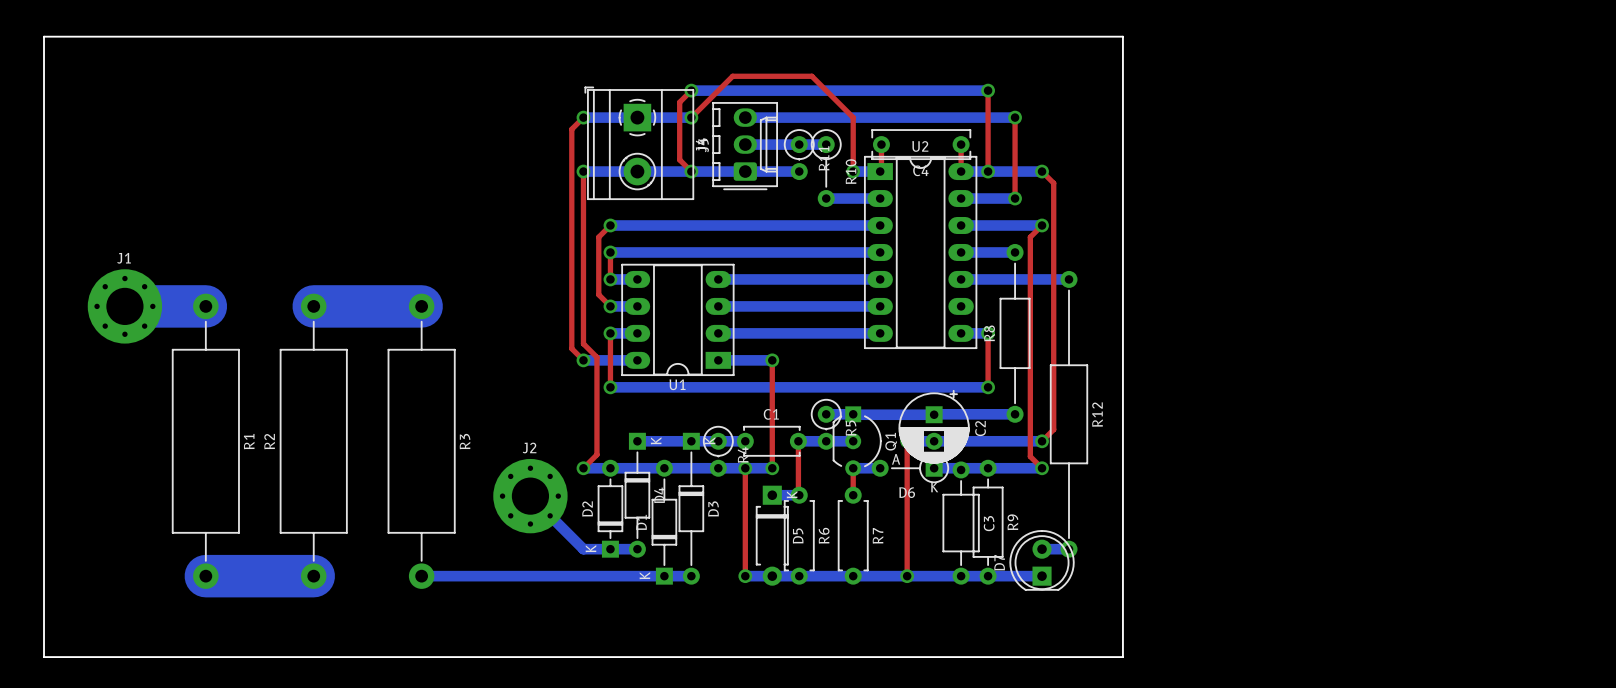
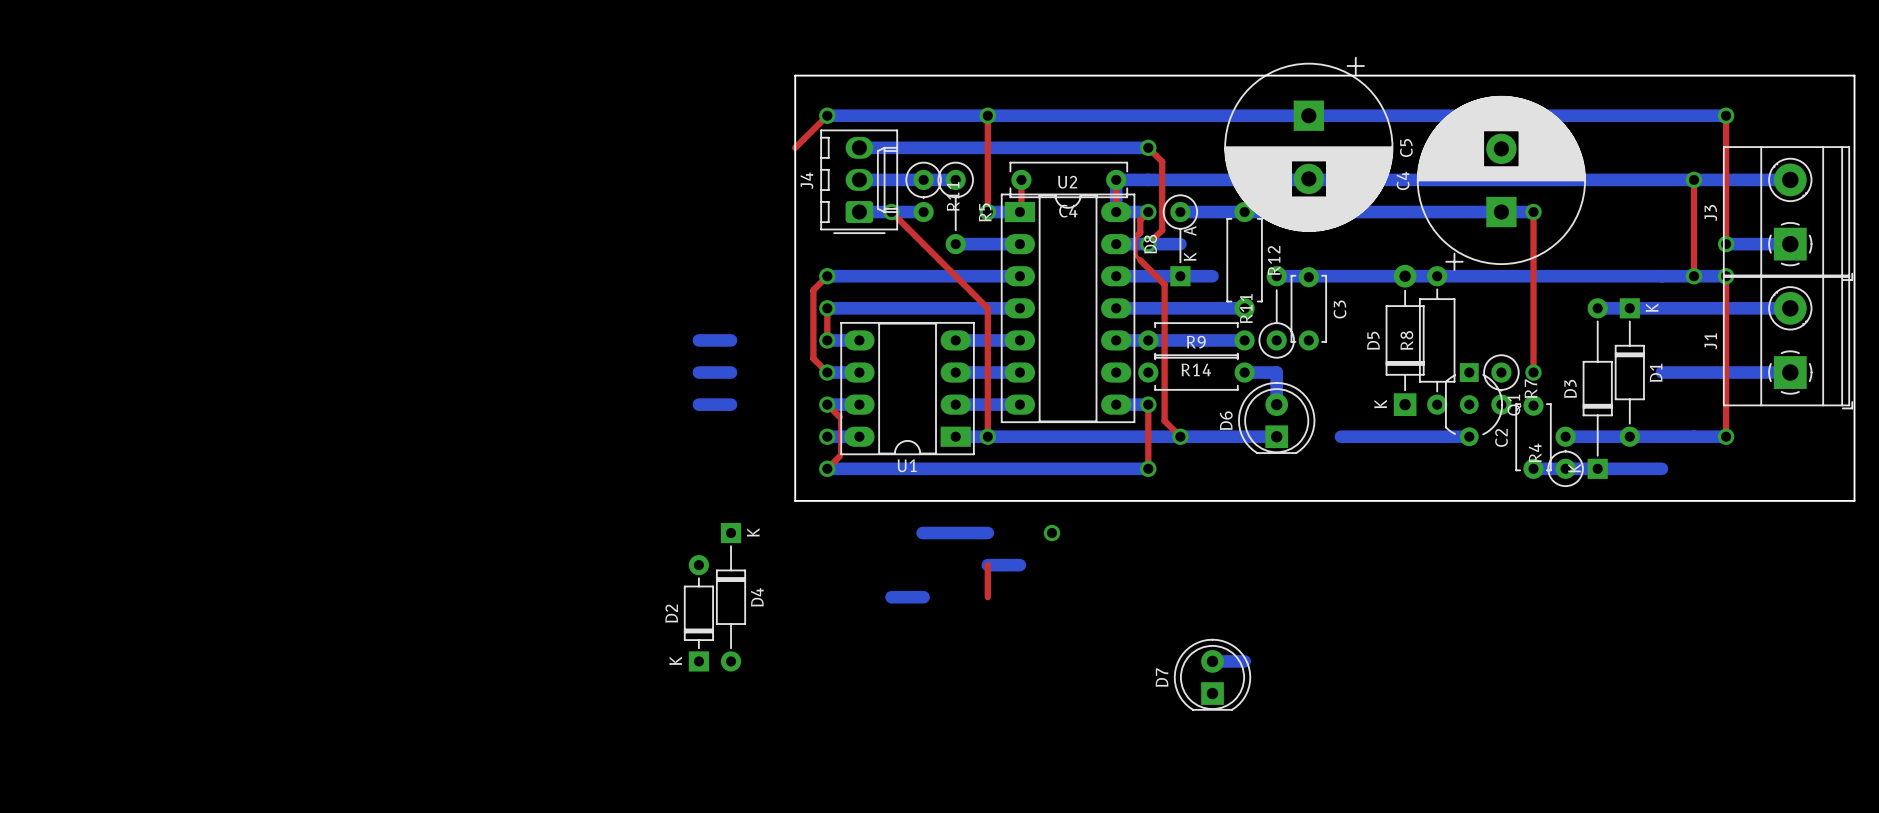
board edge: (44, 36) (1122, 36) (1122, 657) (44, 657) (44, 36) -> none
board edge: none -> (795, 75) (1854, 75) (1854, 500) (795, 500) (795, 75)
top track: (691, 90) (679, 102) (679, 159) (691, 171) -> none
bottom track: (691, 90) (718, 90) -> none
via: (691, 90) -> none
top track: (718, 90) (732, 76) (811, 76) (853, 117) -> (987, 115) (987, 147)
via: none -> (827, 115)
via: none -> (987, 115)
top track: (988, 90) (988, 171) -> (1138, 234) (1140, 232) (1140, 220) (1148, 212)
bottom track: none -> (1148, 115) (1726, 115)
via: (988, 90) -> none
top track: none -> (1726, 115) (1726, 244)
via: none -> (1726, 115)
C5: none -> (1308, 144)
top track: (583, 117) (571, 129) (571, 348) (583, 360) -> none
bottom track: (583, 117) (691, 117) -> none
via: (583, 117) -> none
via: (691, 117) -> none
top track: none -> (1148, 147) (1162, 161) (1162, 230) (1148, 244)
bottom track: (988, 117) (1015, 117) -> none
via: none -> (1148, 147)
top track: (1015, 117) (1015, 198) -> none
via: (1015, 117) -> none
J3 rotation: 0° (639, 143) -> 180° (1788, 213)
J3 position: (639, 143) -> (1788, 213)
top track: none -> (1694, 179) (1694, 276)
via: none -> (1694, 179)
bottom track: none -> (1790, 179) (1116, 179) (1116, 212)
C4: none -> (1501, 183)
top track: (583, 171) (583, 343) (596, 357) (596, 454) (583, 468) -> none
bottom track: (583, 171) (745, 171) -> none
via: (583, 171) -> none
via: (691, 171) -> none
top track: none -> (891, 212) (987, 308) (987, 436)
via: none -> (891, 212)
R10 name: R10 (851, 171) -> R5 (985, 212)
bottom track: (988, 171) (1015, 171) -> none
top track: (1042, 171) (1053, 183) (1053, 429) (1042, 441) -> none
bottom track: none -> (1212, 212) (1533, 212)
via: (1042, 171) -> none
top track: none -> (1533, 212) (1533, 372)
via: none -> (1533, 212)
top track: none -> (1140, 234) (1135, 238) (1135, 255) (1164, 284) (1164, 420) (1180, 436)
D8: none -> (1180, 240)
via position: (1015, 198) -> (1148, 244)
bottom track: none -> (1726, 244) (1790, 244)
via: none -> (1726, 244)
top track: (610, 225) (598, 237) (598, 294) (610, 306) -> (827, 276) (813, 290) (813, 358) (827, 372)
bottom track: (610, 225) (718, 225) -> none
via: (610, 225) -> none
via: none -> (827, 276)
top track: (1042, 225) (1030, 237) (1030, 456) (1042, 468) -> none
via: (1042, 225) -> none
bottom track: none -> (1276, 276) (1726, 276)
via: none -> (1694, 276)
top track: none -> (1726, 276) (1726, 436)
via: none -> (1726, 276)
R8 footprint: [999, 243, 1031, 423] -> [1419, 266, 1456, 415]
top track: (610, 252) (610, 279) -> (827, 308) (827, 340)
bottom track: (610, 252) (718, 252) -> none
via: (610, 252) -> none
via: none -> (827, 308)
bottom track: none -> (1180, 308) (1244, 308)
bottom track: none -> (1597, 308) (1790, 308)
R11: none -> (1276, 312)
J1 name position: J1 (124, 258) -> J1 (1710, 341)
J1 footprint: [87, 269, 163, 344] -> [1723, 274, 1853, 410]
R12 footprint: [1050, 270, 1088, 558] -> [1226, 201, 1263, 319]
via: (610, 279) -> none
via: none -> (827, 340)
bottom track: (745, 279) (826, 279) -> none
R14: none -> (1196, 340)
bottom track: (124, 306) (205, 306) -> none
bottom track: (313, 306) (421, 306) -> none
via: (610, 306) -> none
via: none -> (827, 372)
bottom track: (745, 306) (826, 306) -> none
bottom track: none -> (1244, 372) (1276, 372) (1276, 404)
via: none -> (1533, 372)
bottom track: none -> (1661, 372) (1790, 372)
U1 position: (677, 319) -> (907, 388)
top track: (610, 333) (610, 387) -> none
via: (610, 333) -> none
top track: none -> (827, 404) (839, 417) (839, 456) (827, 468)
via: none -> (827, 404)
bottom track: (745, 333) (826, 333) -> none
bottom track: (583, 360) (637, 360) -> none
via: (583, 360) -> none
via: none -> (827, 436)
bottom track: (745, 360) (772, 360) -> none
top track: (772, 360) (772, 468) -> none
via: (772, 360) -> none
bottom track: none -> (955, 436) (1276, 436)
via: none -> (987, 436)
via: none -> (1180, 436)
bottom track: none -> (1565, 436) (1726, 436)
via: none -> (1726, 436)
bottom track: (610, 387) (718, 387) -> none
via: (610, 387) -> none
via: none -> (827, 468)
bottom track: none -> (1533, 468) (1661, 468)
C2 footprint: [898, 390, 970, 464] -> [1515, 395, 1552, 479]
bottom track: (826, 414) (1015, 414) -> none
R5: (826, 424) -> none
C2 name position: C2 (980, 428) -> C2 (1501, 437)
R1: (205, 441) -> none
R2: (313, 441) -> none
R3: (421, 441) -> none
bottom track: (637, 441) (745, 441) -> none
C1: (771, 441) -> none
top track: (798, 441) (799, 495) -> none
Q1 position: (857, 441) -> (1474, 404)
top track: (907, 441) (907, 576) -> none
bottom track: (907, 441) (1042, 441) -> none
via: (1042, 441) -> none
R4 rotation: 0° (718, 451) -> 180° (1565, 456)
R4 position: (718, 451) -> (1565, 456)
D6 footprint: [871, 453, 949, 483] -> [1238, 382, 1316, 454]
R9 footprint: [972, 459, 1004, 585] -> [1138, 354, 1255, 391]
C3 footprint: [942, 461, 980, 585] -> [1290, 267, 1327, 351]
bottom track: (583, 468) (772, 468) -> none
via: (583, 468) -> none
top track: (745, 468) (745, 576) -> none
via: (745, 468) -> none
via: (772, 468) -> none
bottom track: (934, 468) (1042, 468) -> (1340, 436) (1469, 436)
via: (1042, 468) -> none
D5 footprint: [756, 485, 789, 586] -> [1385, 264, 1425, 417]
R7 footprint: [838, 486, 869, 585] -> [1483, 354, 1520, 415]
D6 name position: D6 (907, 492) -> D6 (1226, 420)
bottom track: (530, 496) (583, 549) (637, 549) -> none
J2: (530, 496) -> none
D3 rotation: 0° (691, 508) -> 180° (1597, 388)
D3 position: (691, 508) -> (1597, 388)
D1 rotation: 0° (664, 522) -> 180° (1629, 372)
D1 position: (664, 522) -> (1629, 372)
R9 name position: R9 (1012, 522) -> R9 (1196, 342)
D5 name position: D5 (798, 535) -> D5 (1373, 340)
R6: (799, 535) -> none
bottom track: (205, 576) (313, 576) -> none
bottom track: (421, 576) (691, 576) -> none
bottom track: (745, 576) (1042, 576) -> none
via: (745, 576) -> none
via: (907, 576) -> none

